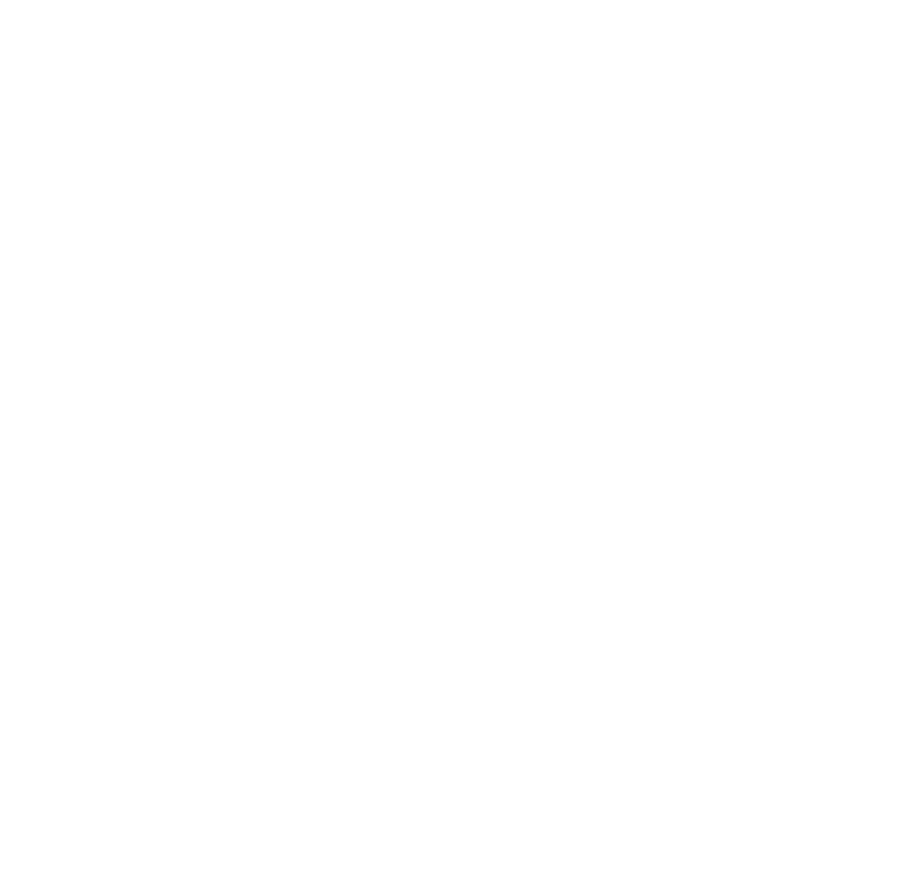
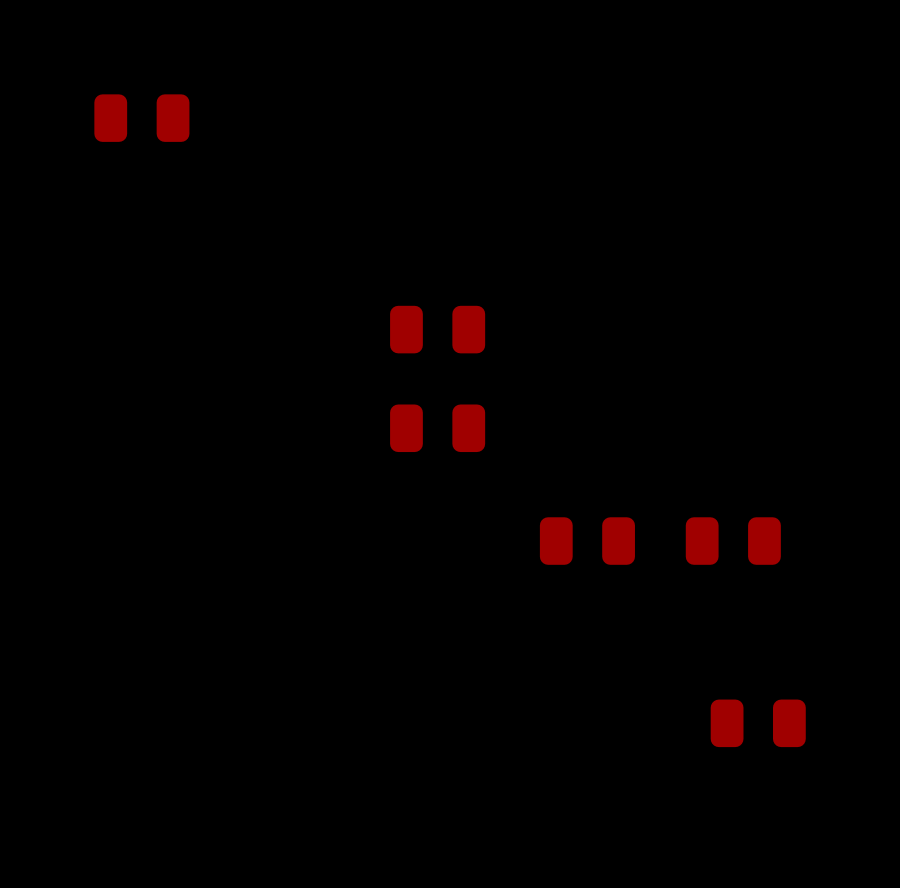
part: none -> (141, 118)
part: none -> (437, 329)
part: none -> (437, 428)
part: none -> (587, 541)
part: none -> (733, 541)
part: none -> (758, 723)

